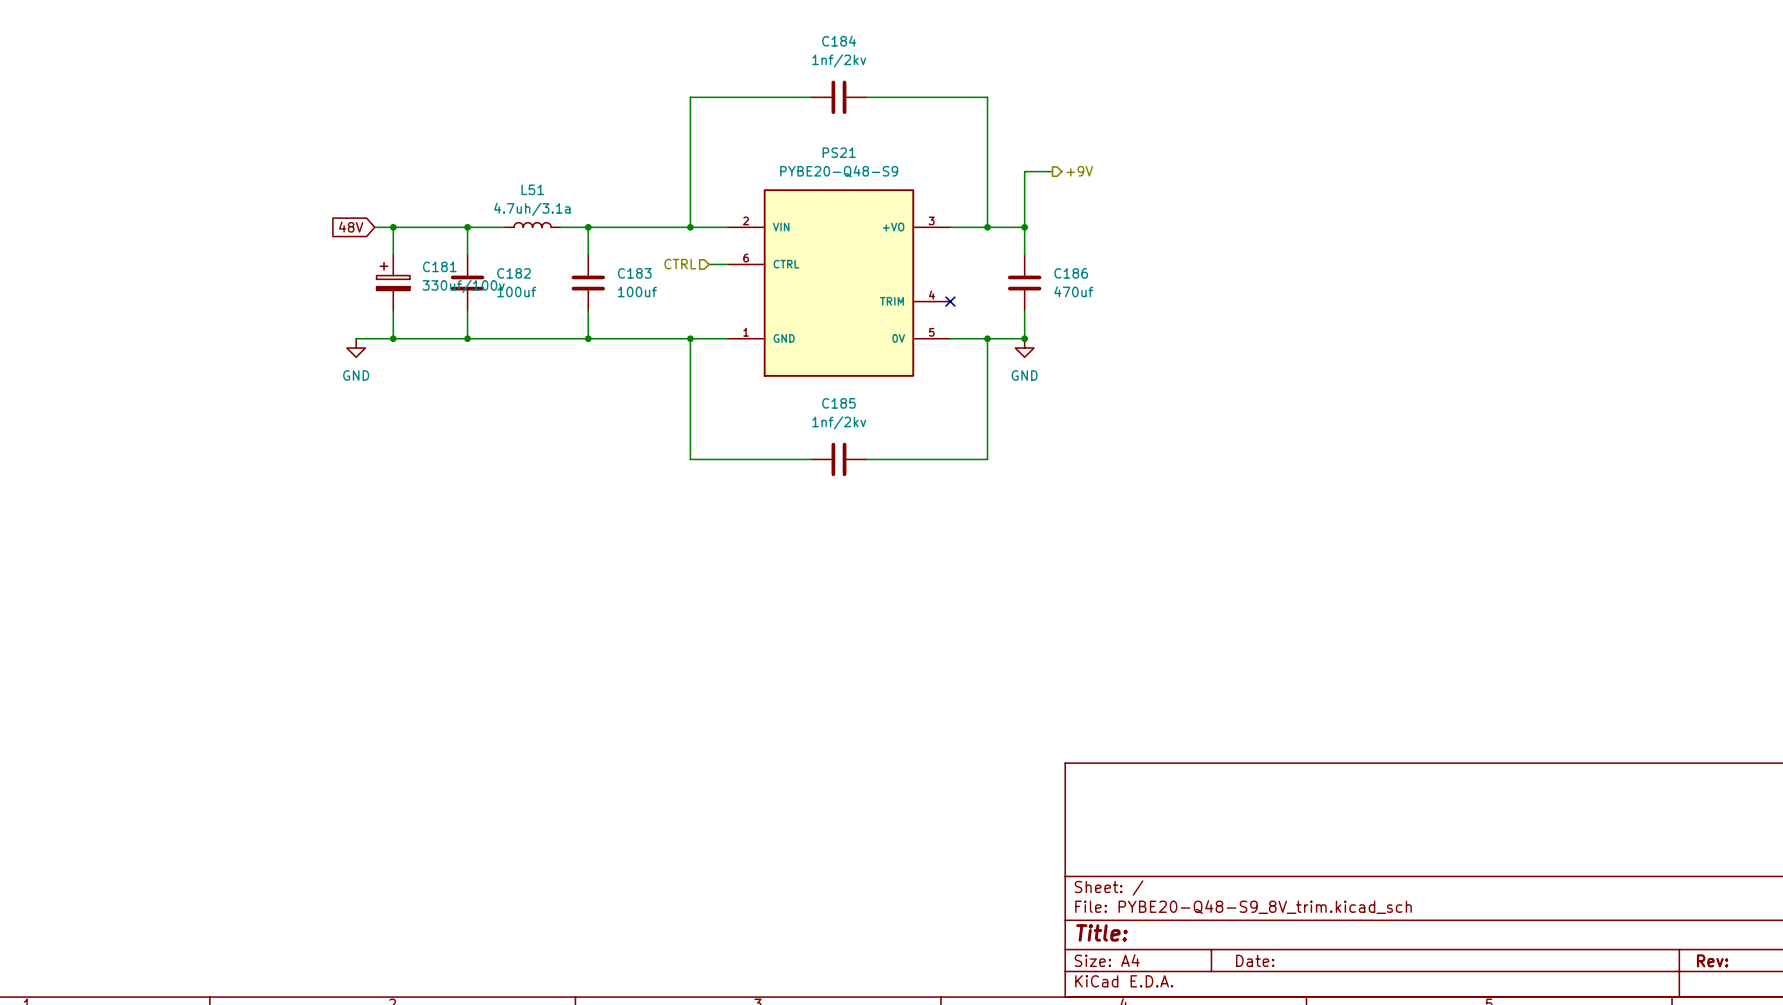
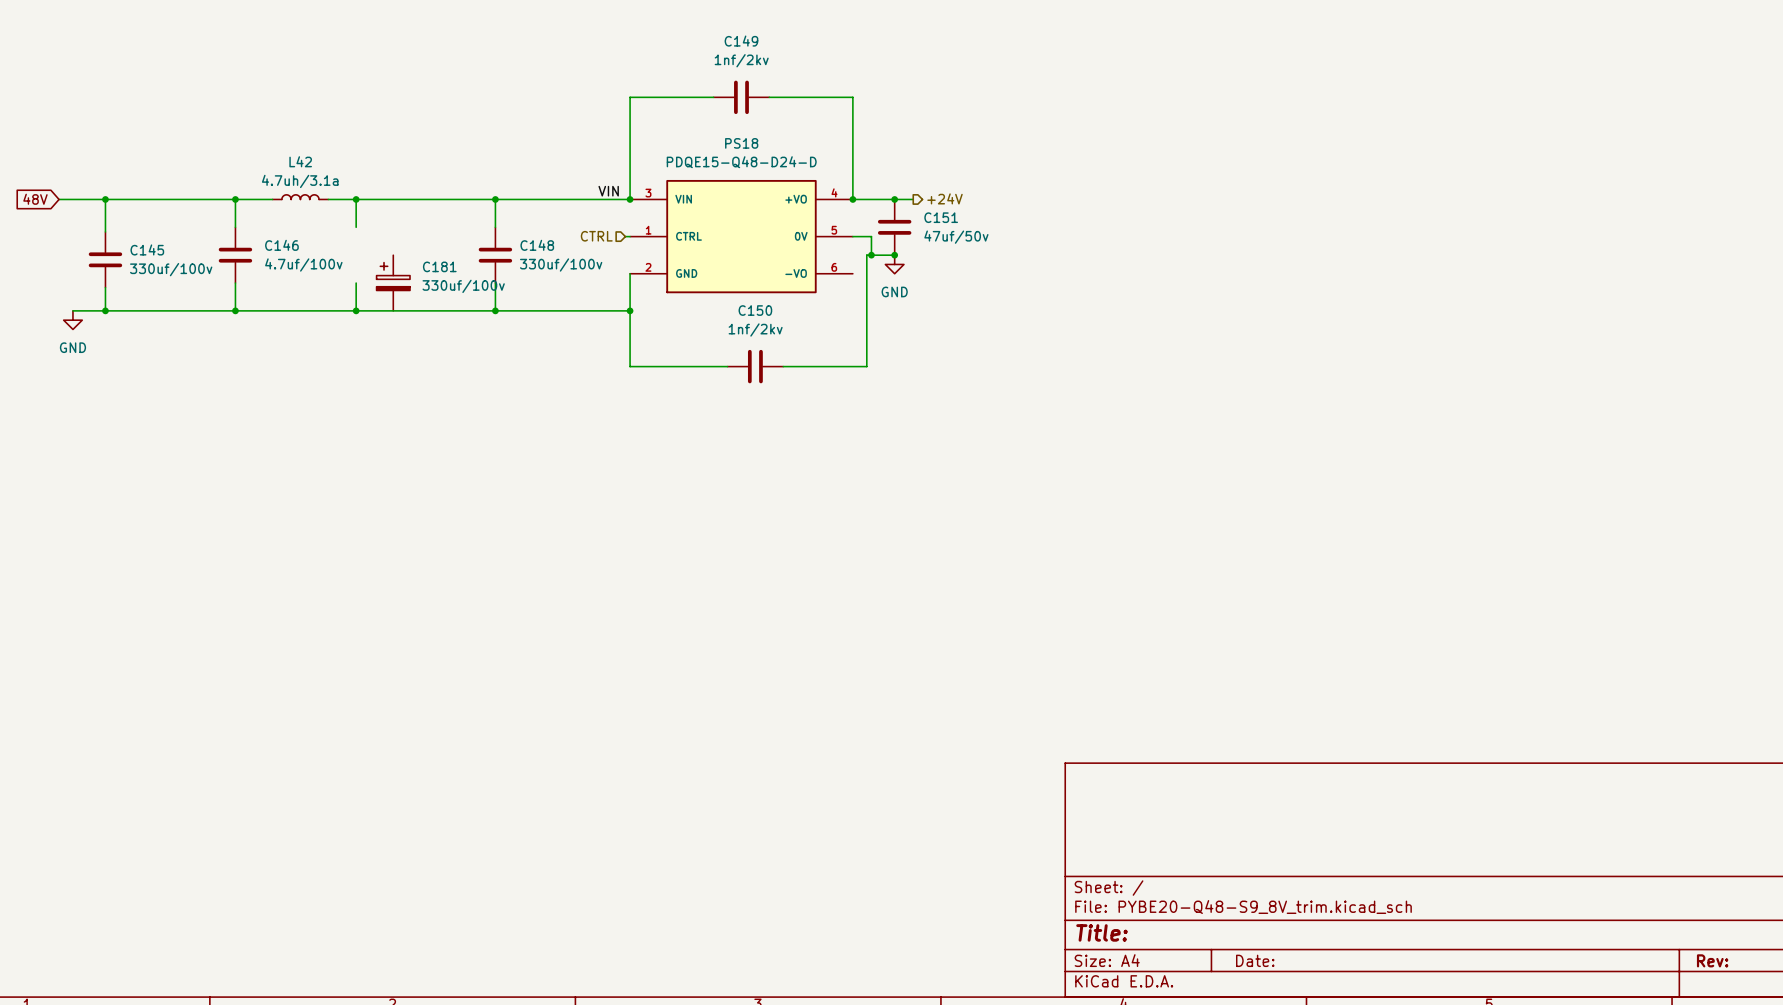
wire: (690, 97) (690, 227) -> (690, 97) (630, 97) (630, 199) (328, 199)
C149: none -> 1nf/2kv (741, 97)
wire: none -> (811, 97) (852, 97) (852, 199) (913, 199)
C184: 1nf/2kv (838, 97) -> none
wire: (866, 97) (987, 97) (987, 227) -> none
wire: (1052, 171) (1024, 171) (1024, 255) -> none
hierarchical label: +9V (1079, 171) -> none
label: none -> VIN (608, 191)
L42: none -> 4.7uh/3.1a (300, 197)
hierarchical label: none -> +24V (945, 198)
global label: none -> 48V (35, 199)
wire: none -> (59, 199) (272, 199)
wire: none -> (105, 199) (105, 231)
junction: none -> (105, 199)
wire: none -> (235, 199) (235, 227)
junction: none -> (235, 199)
junction: none -> (356, 199)
junction: none -> (630, 199)
junction: none -> (852, 199)
junction: none -> (894, 199)
L51: 4.7uh/3.1a (532, 225) -> none
global label: 48V (351, 227) -> none
wire: (374, 227) (504, 227) -> none
wire: (393, 227) (393, 255) -> (356, 199) (356, 227)
junction: (393, 227) -> none
wire: (467, 227) (467, 255) -> (495, 199) (495, 227)
junction position: (467, 227) -> (495, 199)
wire: (560, 227) (727, 227) -> none
wire: (588, 227) (588, 255) -> none
junction: (588, 227) -> none
junction: (690, 227) -> none
C151: none -> 47uf/50v (894, 227)
wire: (950, 227) (1024, 227) -> none
junction: (987, 227) -> none
junction: (1024, 227) -> none
wire: none -> (625, 236) (630, 236)
PS18: none -> PDQE15-Q48-D24-D (741, 236)
C146: none -> 4.7uf/100v (235, 255)
C148: none -> 330uf/100v (495, 255)
junction: none -> (871, 255)
junction: none -> (894, 255)
C145: none -> 330uf/100v (105, 259)
hierarchical label position: CTRL (680, 264) -> CTRL (596, 236)
wire: none -> (630, 273) (630, 366) (727, 366)
wire: none -> (235, 283) (235, 310)
C182: 100uf (467, 283) -> none
C183: 100uf (588, 283) -> none
PS21: PYBE20-Q48-S9 (838, 283) -> none
C186: 470uf (1024, 283) -> none
wire: none -> (105, 287) (105, 310)
no-connect mark: (950, 301) -> none
wire: none -> (72, 310) (630, 310)
junction: none -> (105, 310)
junction: none -> (235, 310)
junction: none -> (356, 310)
wire: (393, 310) (393, 338) -> (356, 283) (356, 310)
wire: (467, 310) (467, 338) -> (495, 283) (495, 310)
wire: (588, 310) (588, 338) -> none
junction: none -> (630, 310)
wire: (1024, 310) (1024, 338) (950, 338) -> none
power symbol: none -> GND (72, 320)
wire: (356, 338) (727, 338) -> none
junction: (393, 338) -> none
junction position: (467, 338) -> (495, 310)
junction: (588, 338) -> none
wire: (690, 338) (690, 459) (811, 459) -> none
junction: (690, 338) -> none
wire: (987, 338) (987, 459) (866, 459) -> none
junction: (987, 338) -> none
junction: (1024, 338) -> none
power symbol: GND (356, 348) -> none
power symbol position: GND (1024, 348) -> GND (894, 264)
C150: none -> 1nf/2kv (755, 366)
C185: 1nf/2kv (838, 459) -> none

